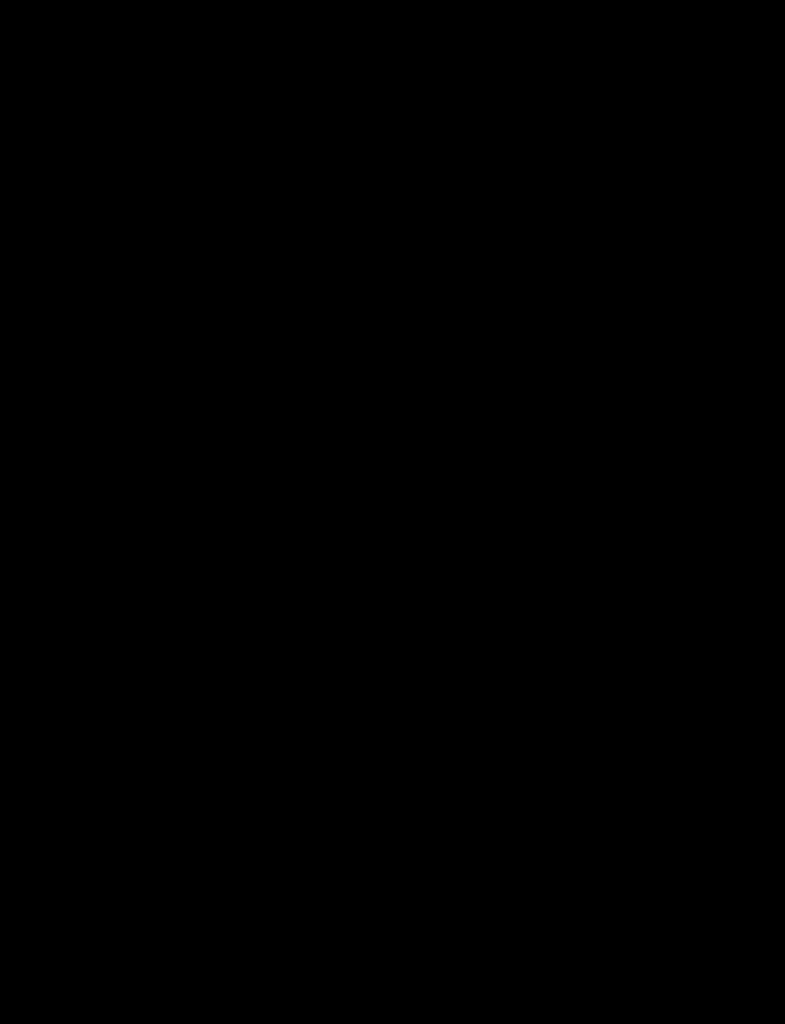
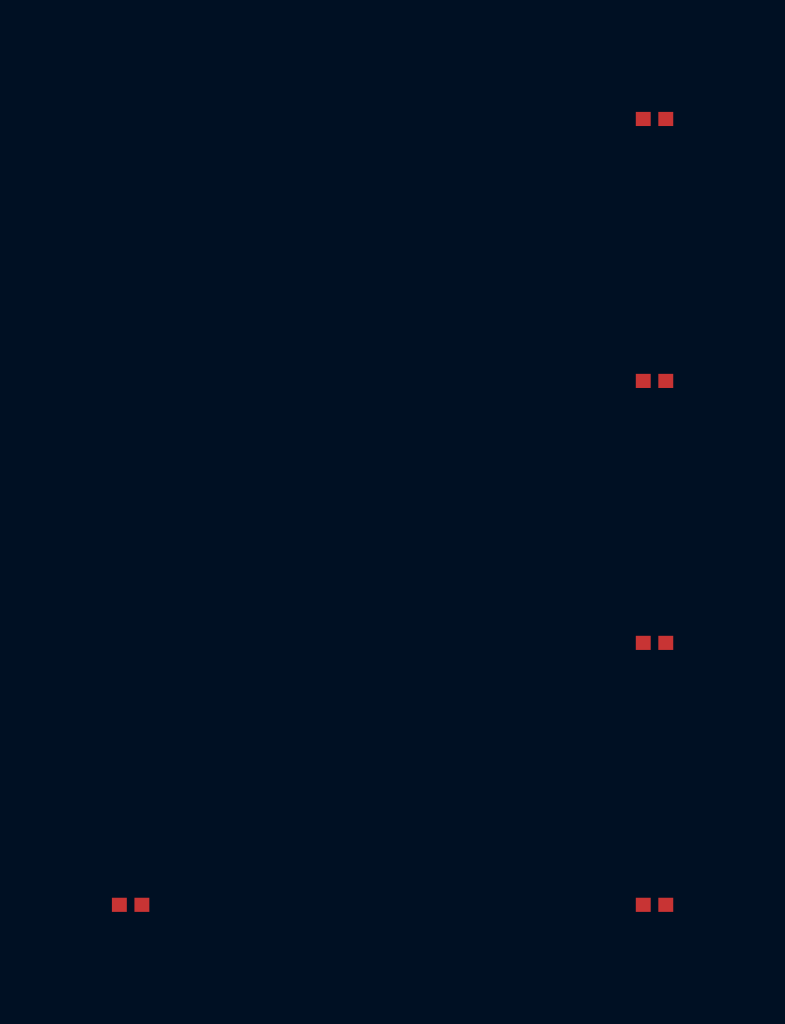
part: none -> (654, 118)
part: none -> (654, 380)
part: none -> (654, 642)
part: none -> (130, 904)
part: none -> (654, 904)

